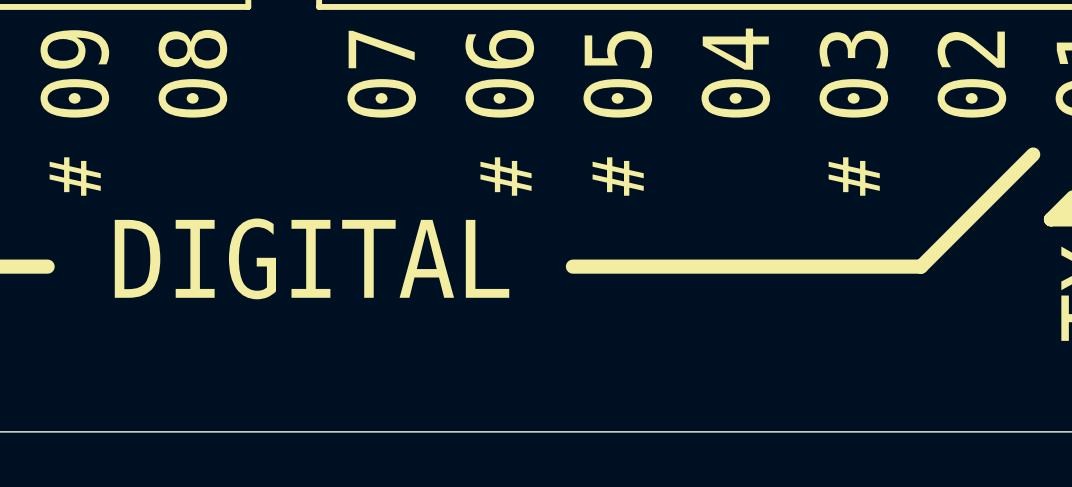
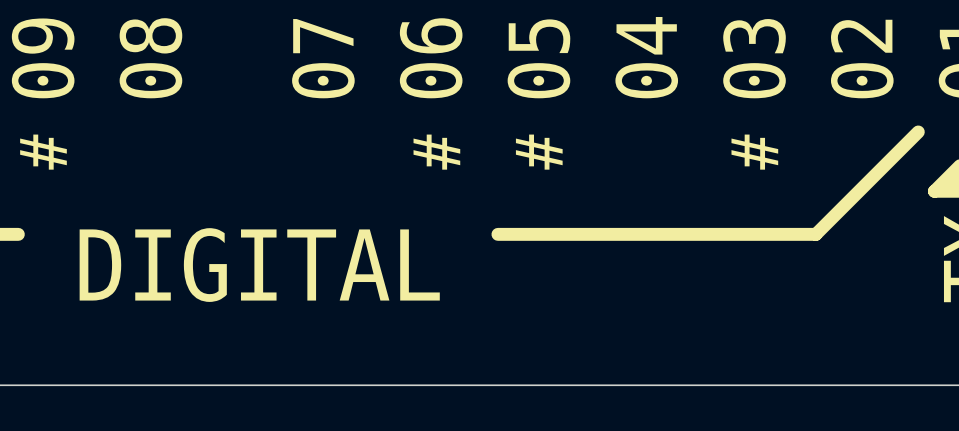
text position: DIGITAL (312, 258) -> DIGITAL (259, 265)

